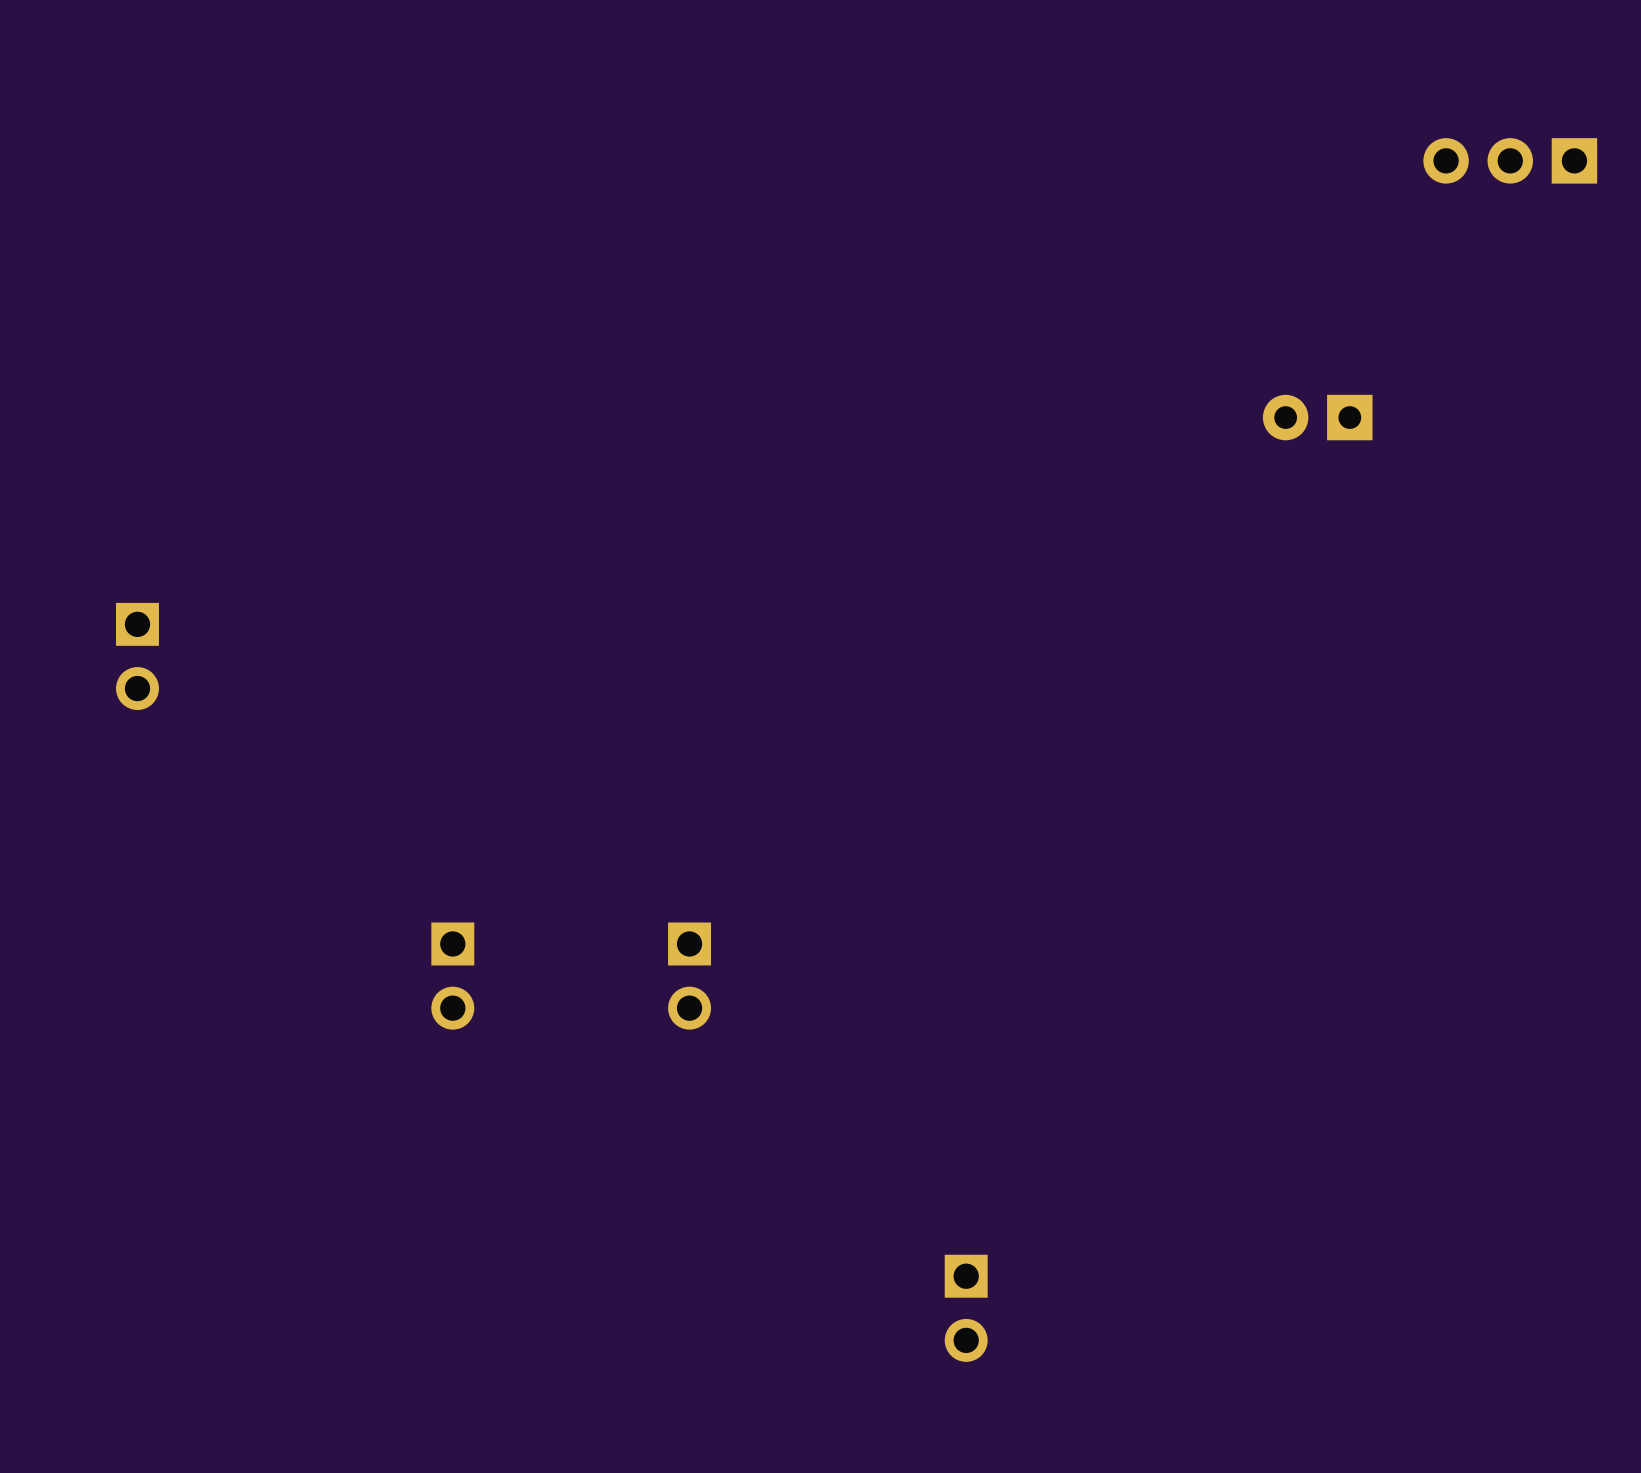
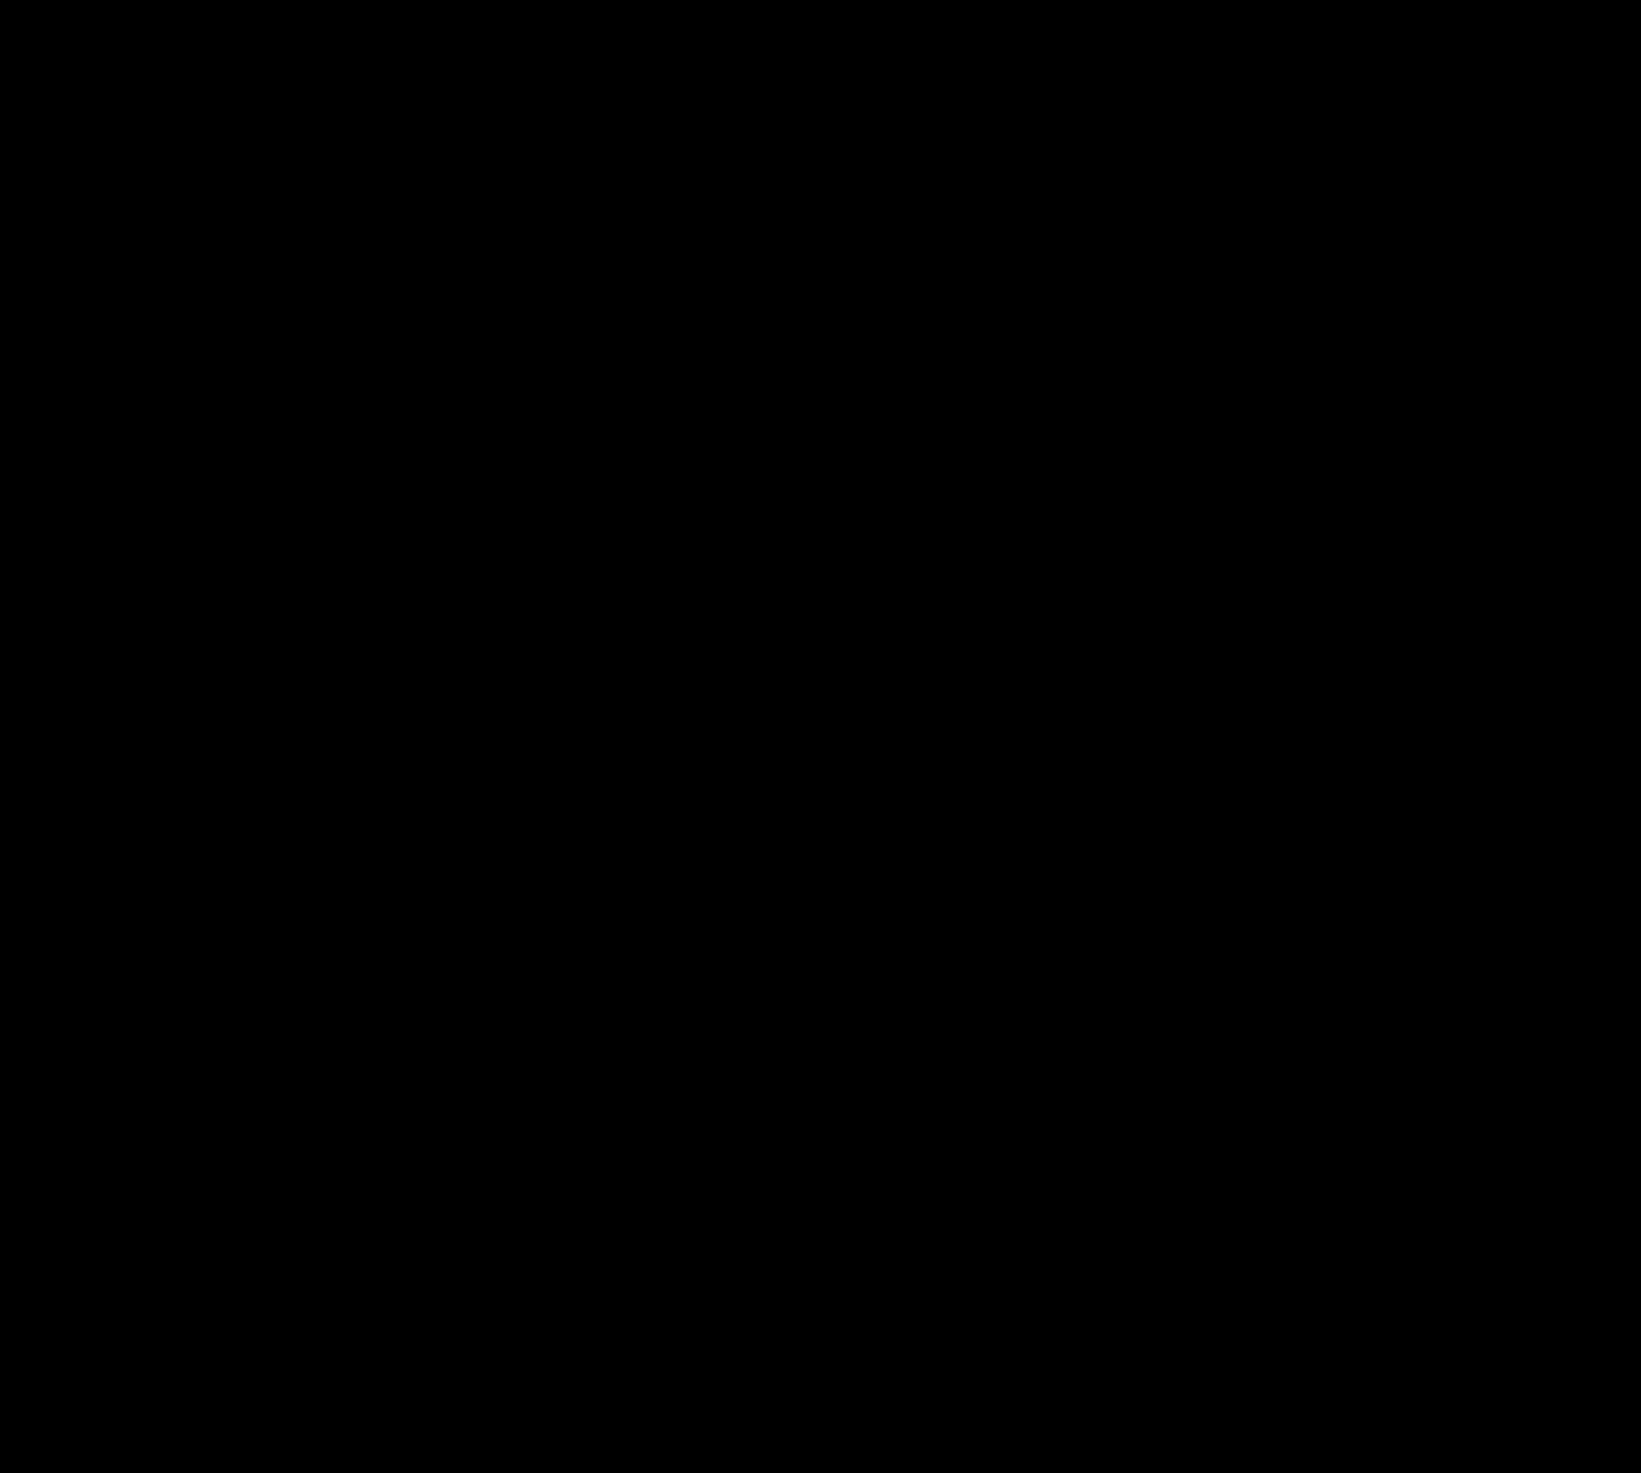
part: (1510, 160) -> none
part: (1317, 417) -> none
part: (137, 656) -> none
part: (452, 976) -> none
part: (689, 976) -> none
part: (966, 1308) -> none

